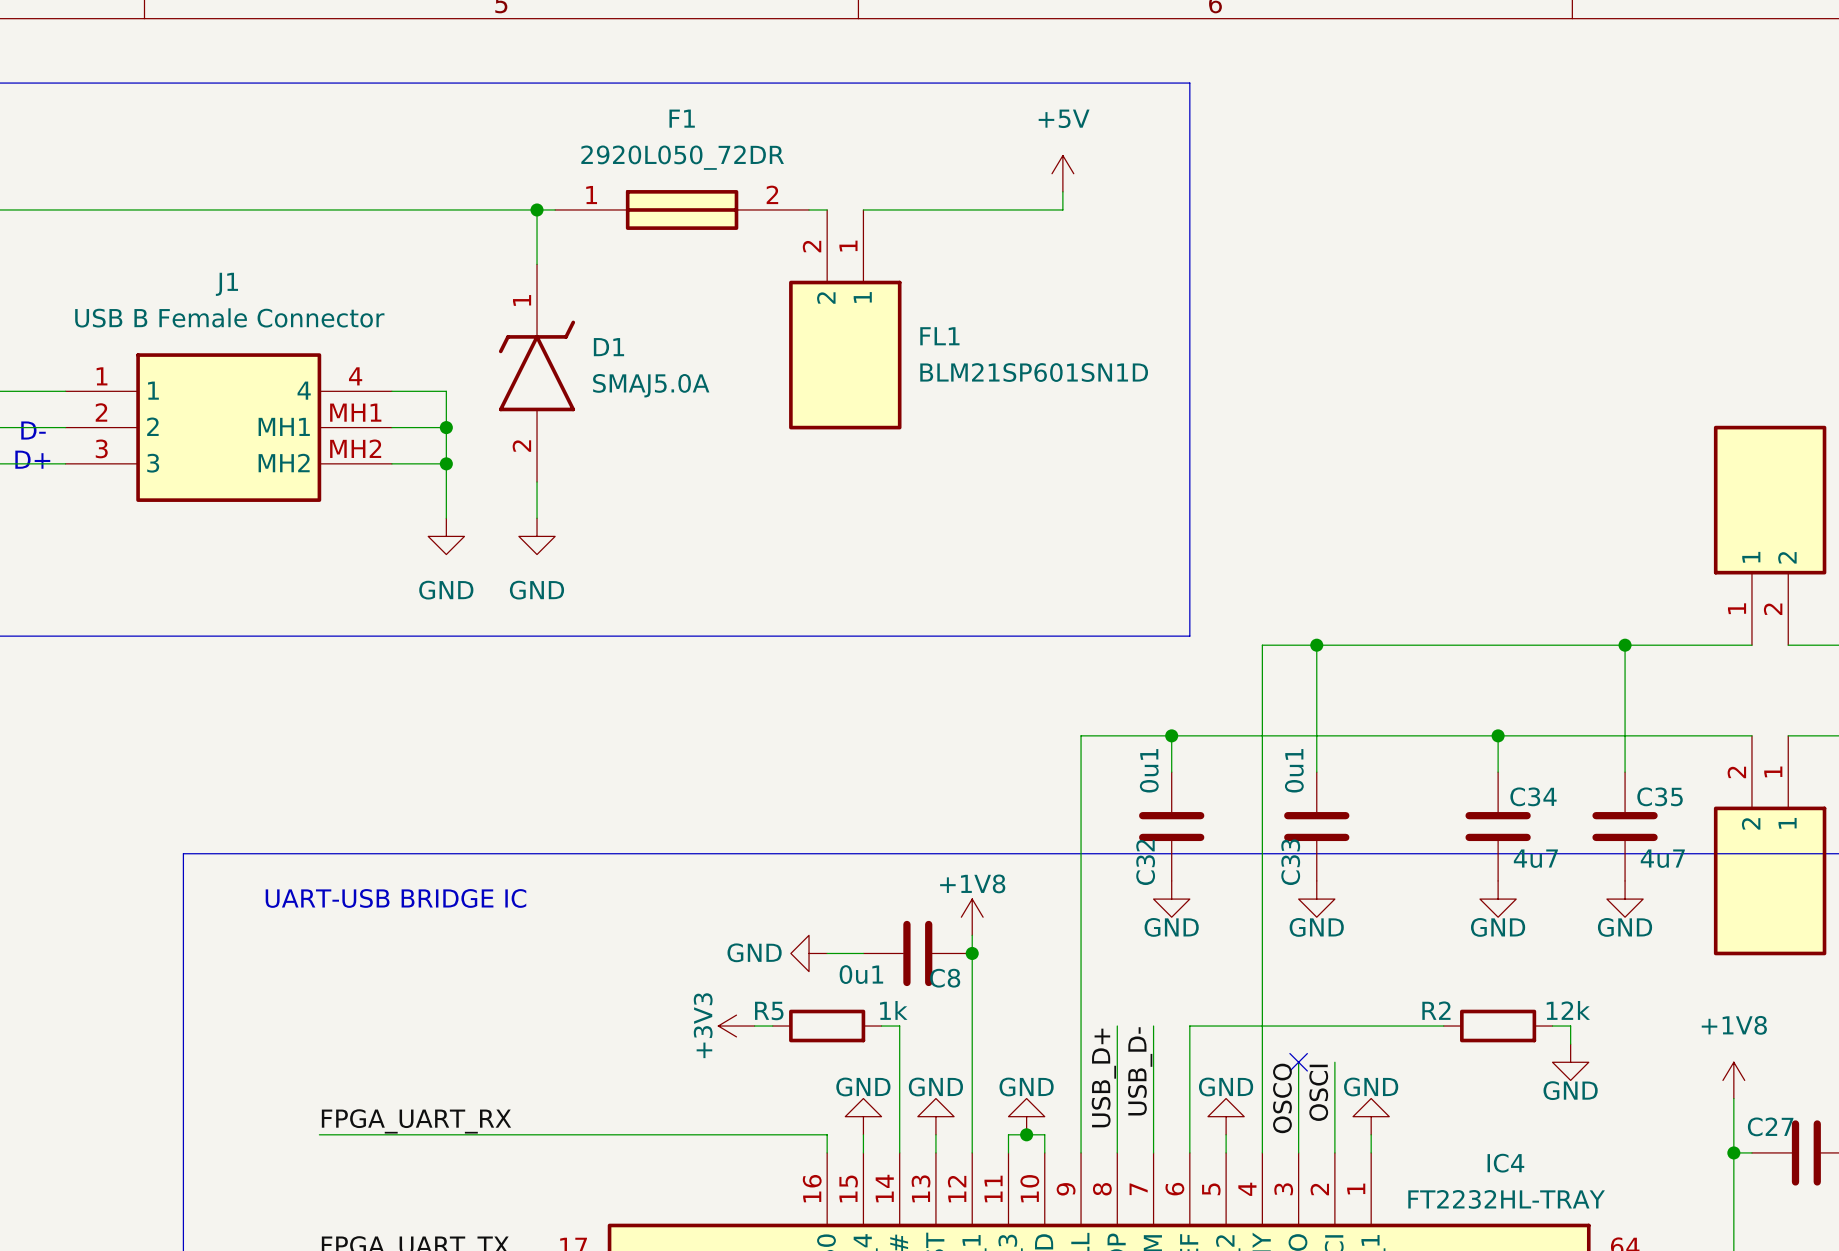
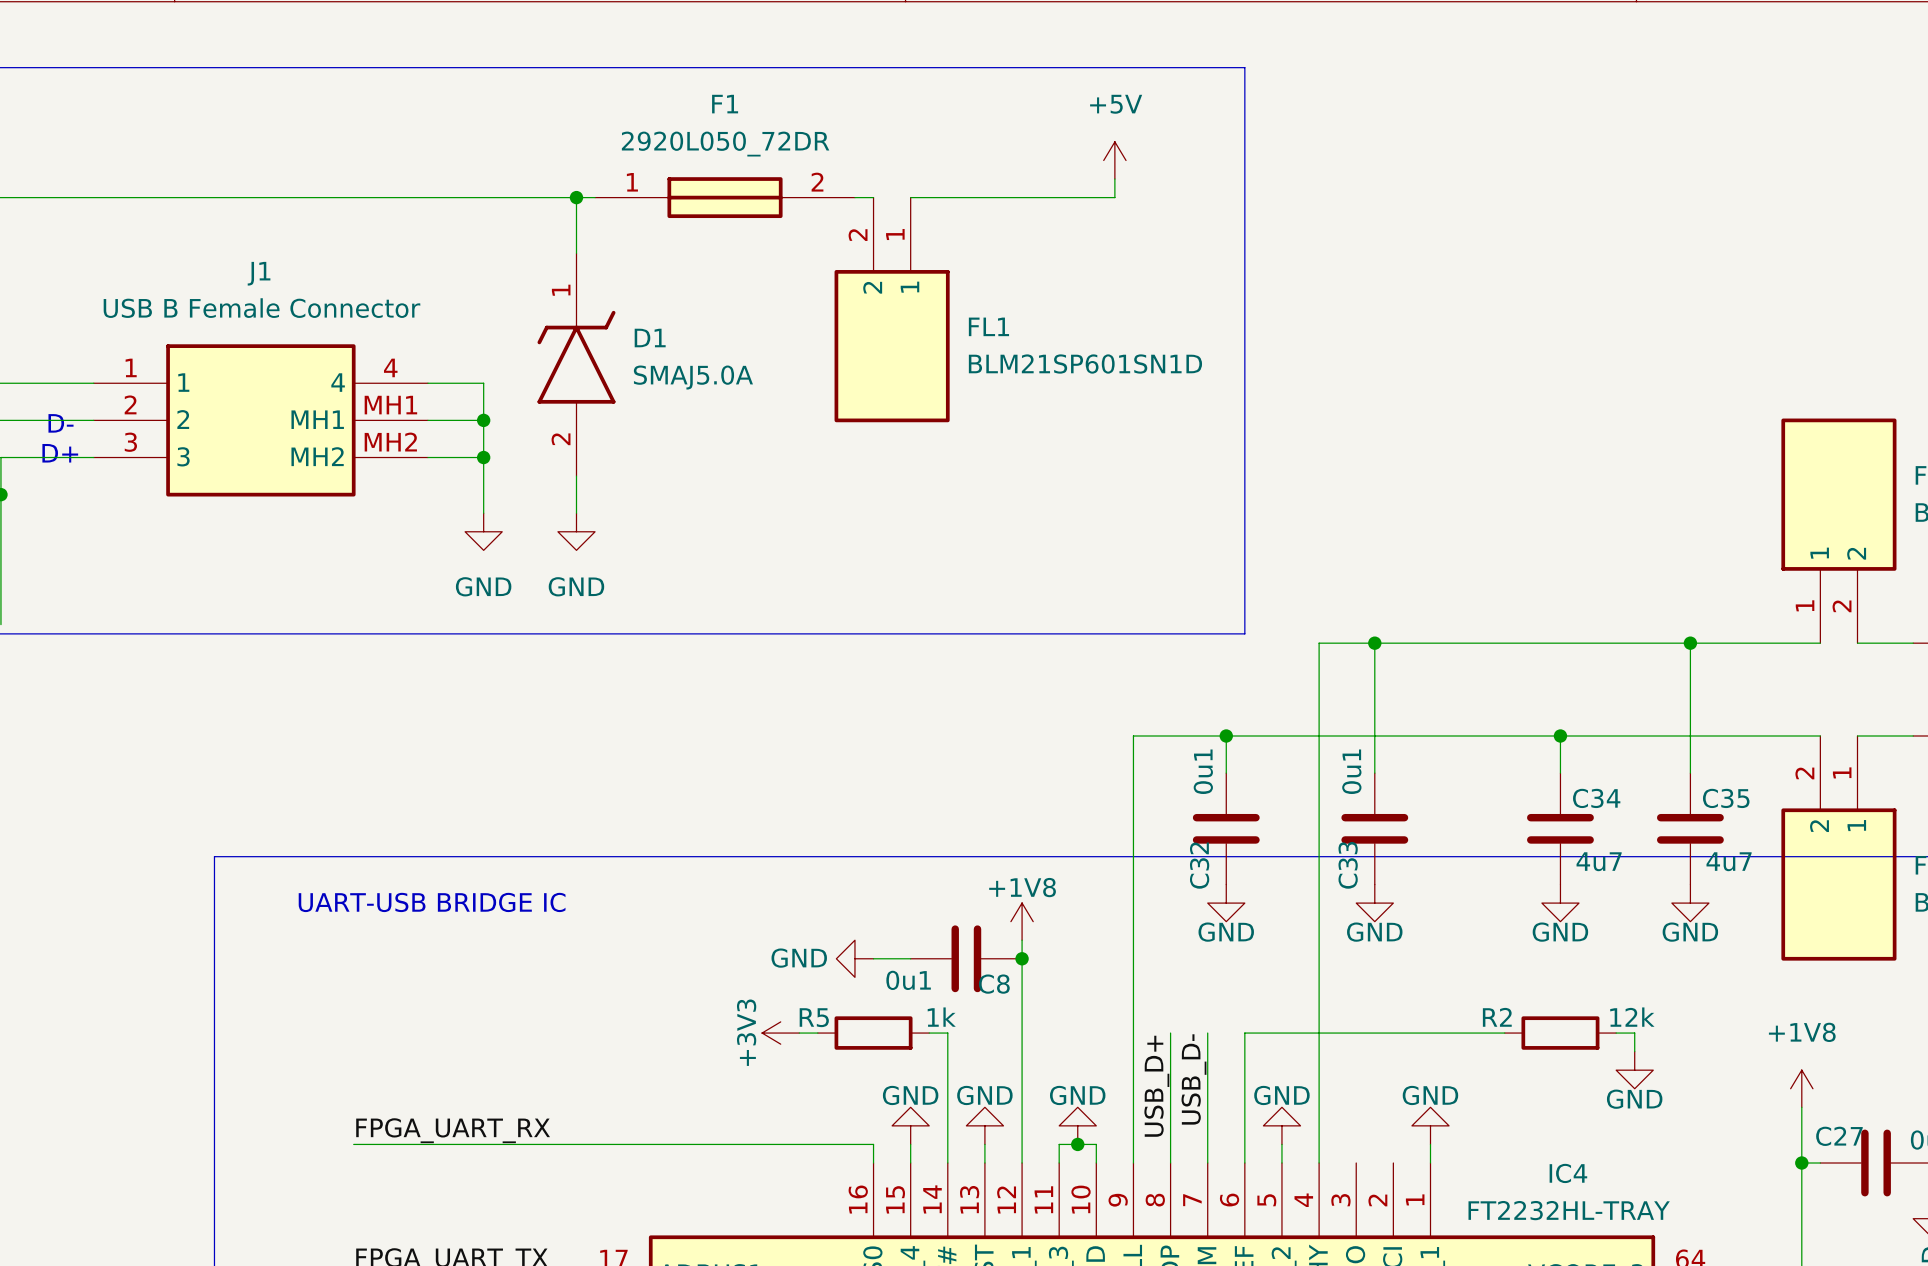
wire: (1298, 1062) (1298, 1152) -> none
no-connect mark: (1298, 1062) -> none
wire: (1334, 1062) (1334, 1152) -> none
label: OSCI (1318, 1092) -> none
label: OSCO (1282, 1098) -> none

